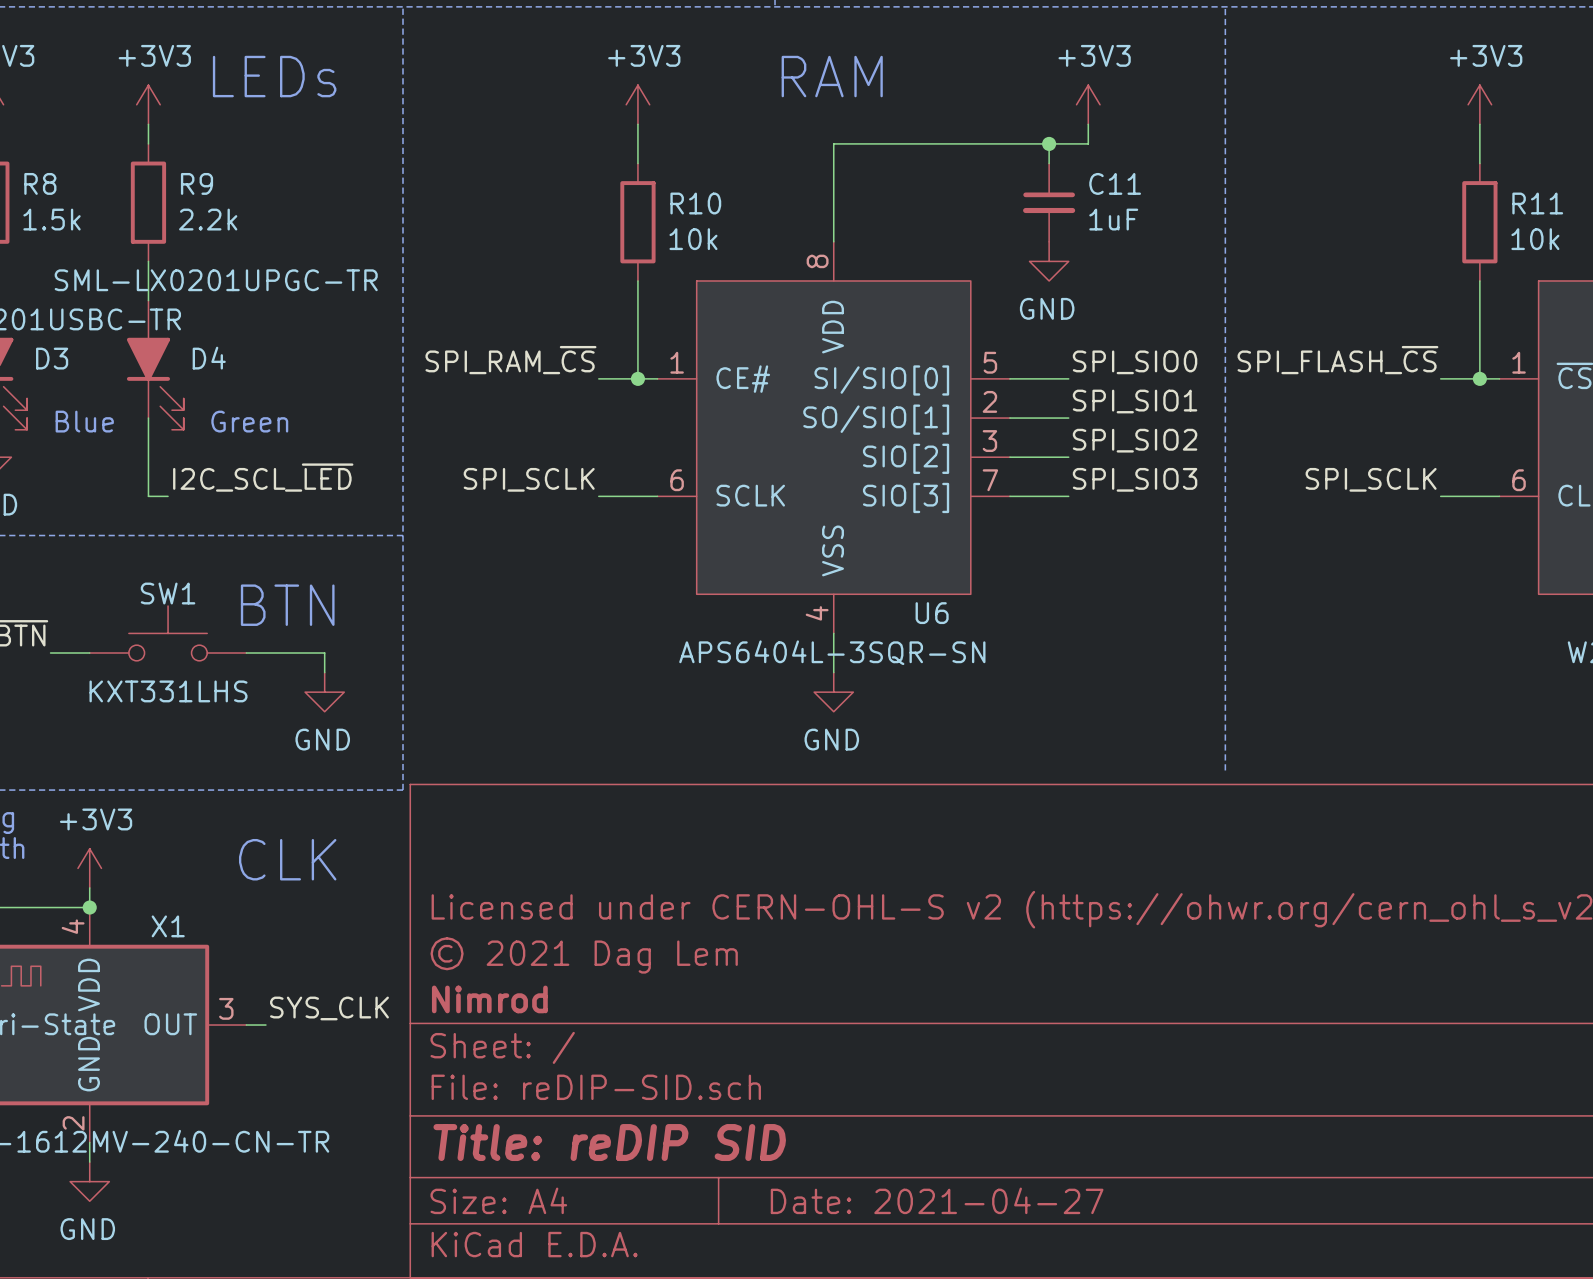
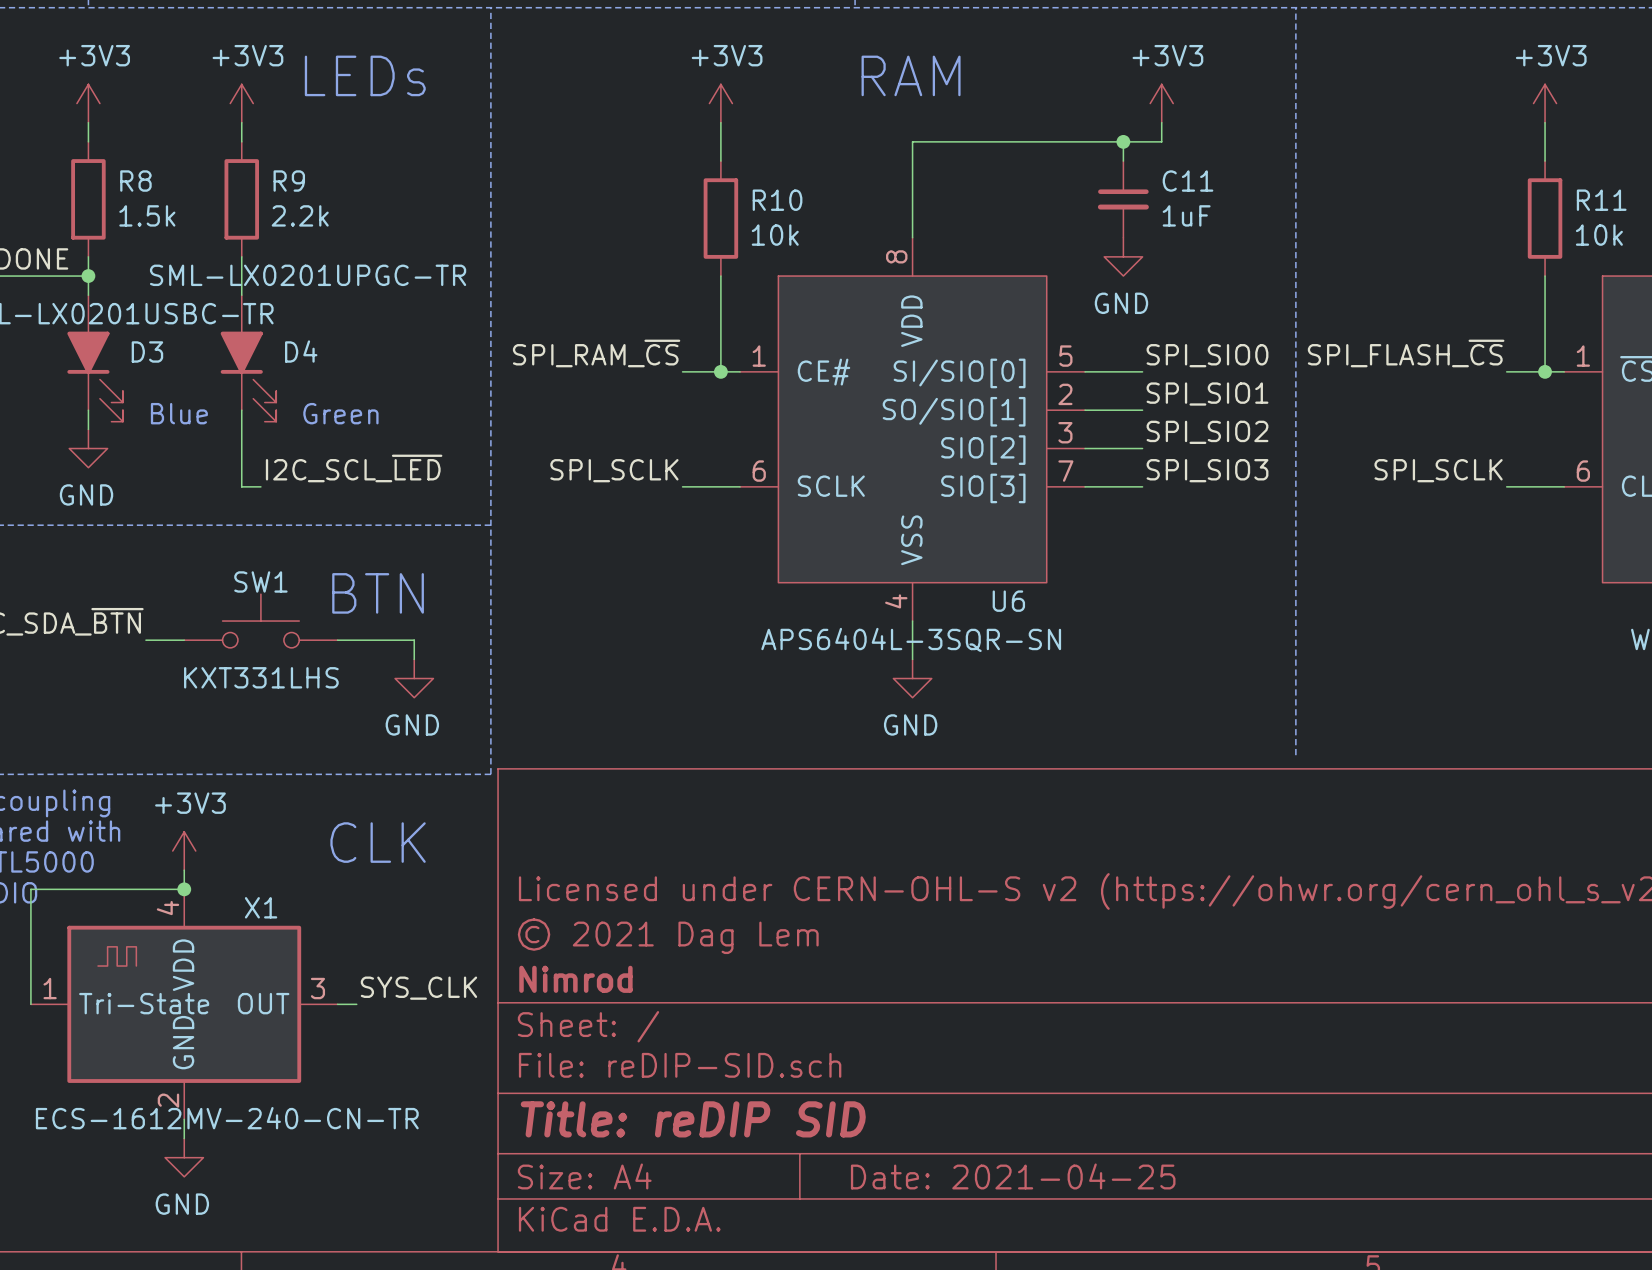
title block: Date: 2021-04-27 (937, 1200) -> Date: 2021-04-25 (1013, 1176)

